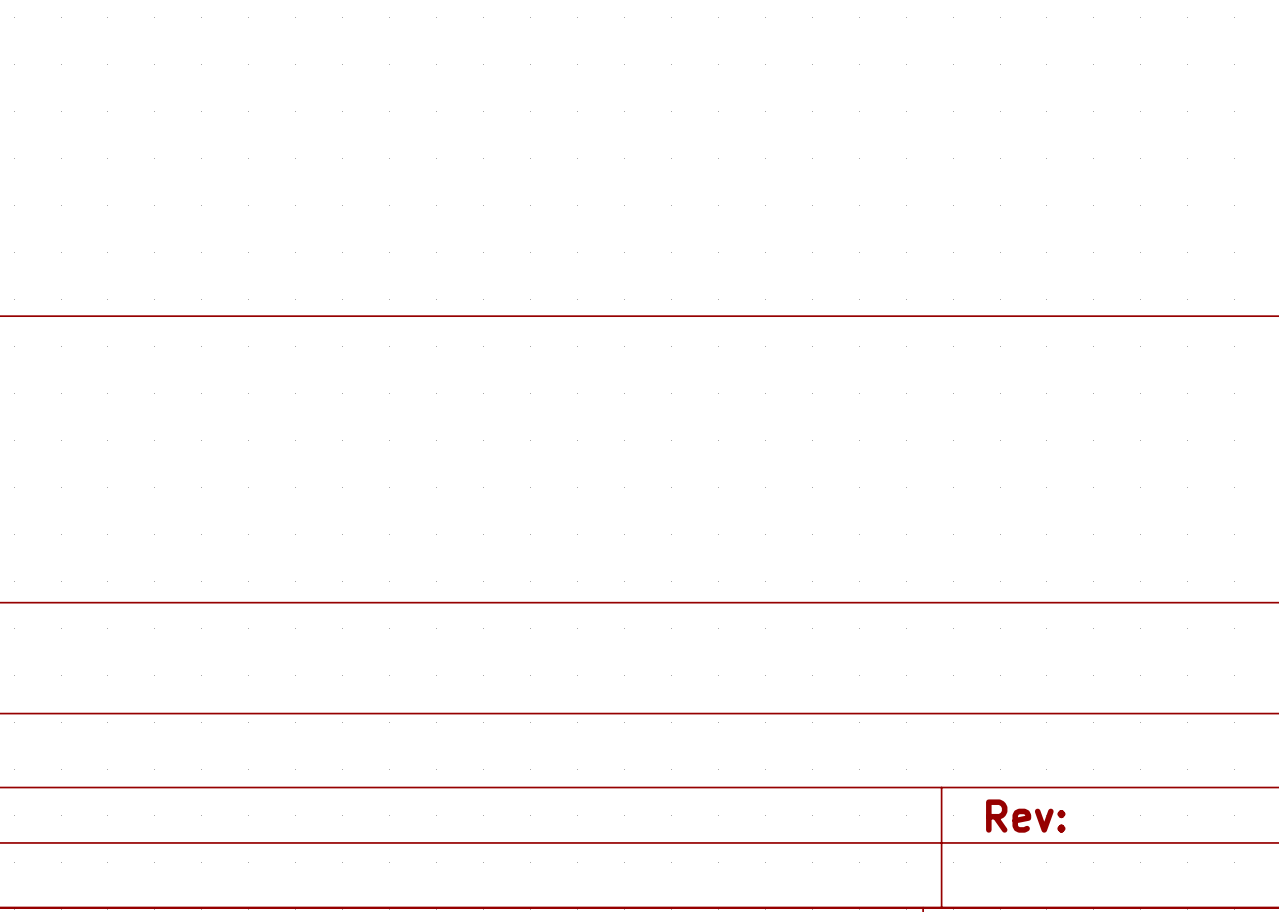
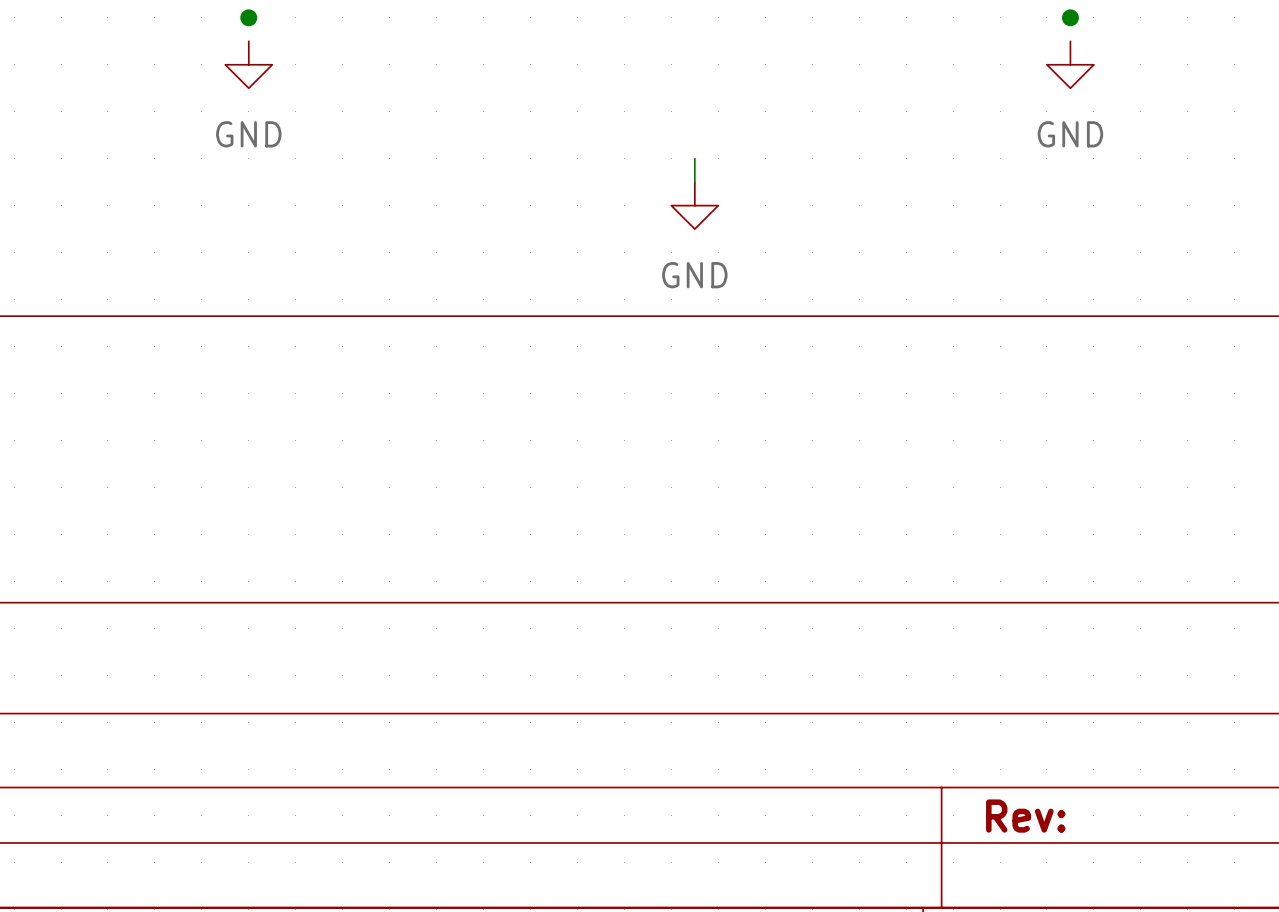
junction: none -> (248, 17)
junction: none -> (1070, 17)
power symbol: none -> GND (248, 64)
power symbol: none -> GND (1070, 64)
wire: none -> (694, 158) (694, 182)
power symbol: none -> GND (694, 205)

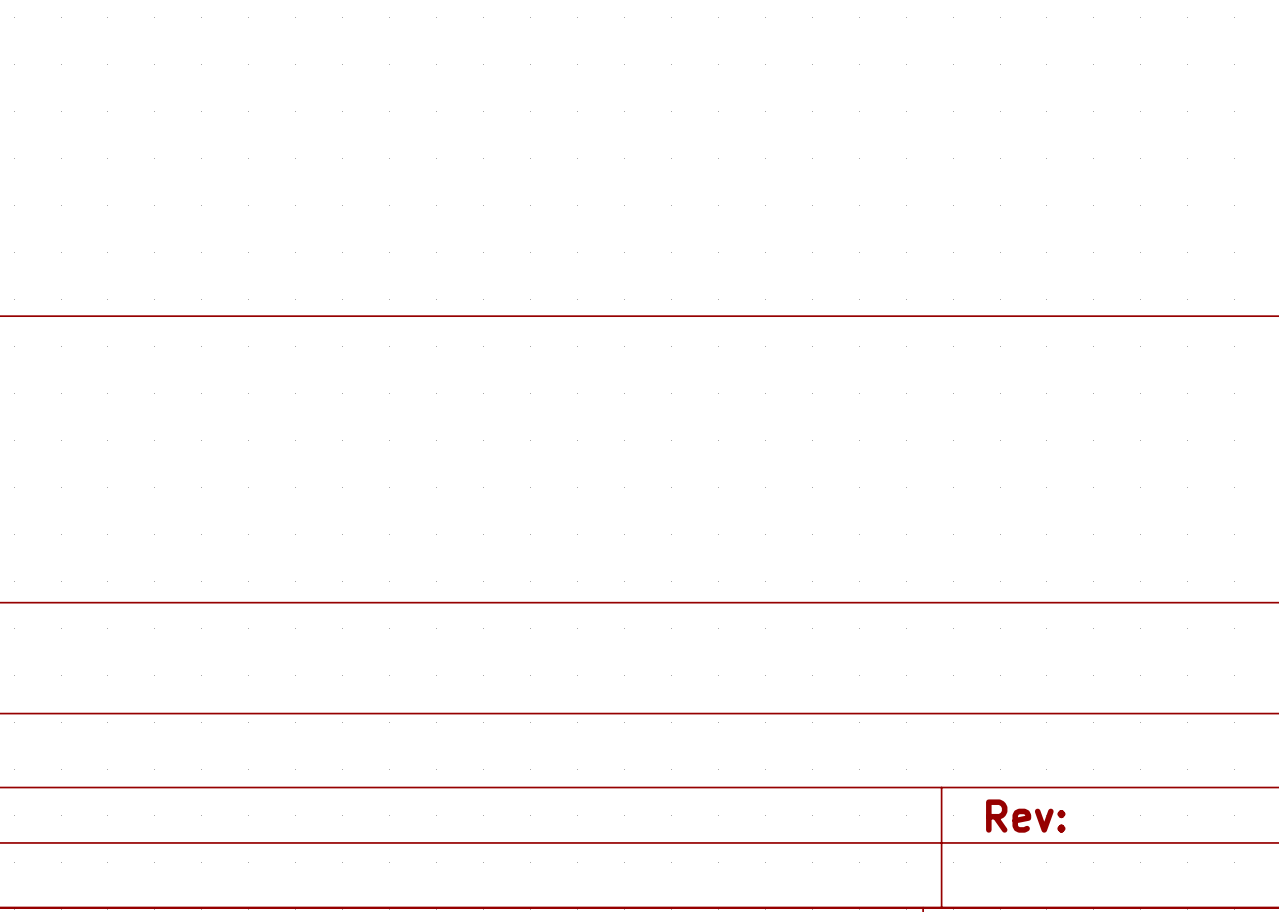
junction: (248, 17) -> none
junction: (1070, 17) -> none
power symbol: GND (248, 64) -> none
power symbol: GND (1070, 64) -> none
wire: (694, 158) (694, 182) -> none
power symbol: GND (694, 205) -> none

